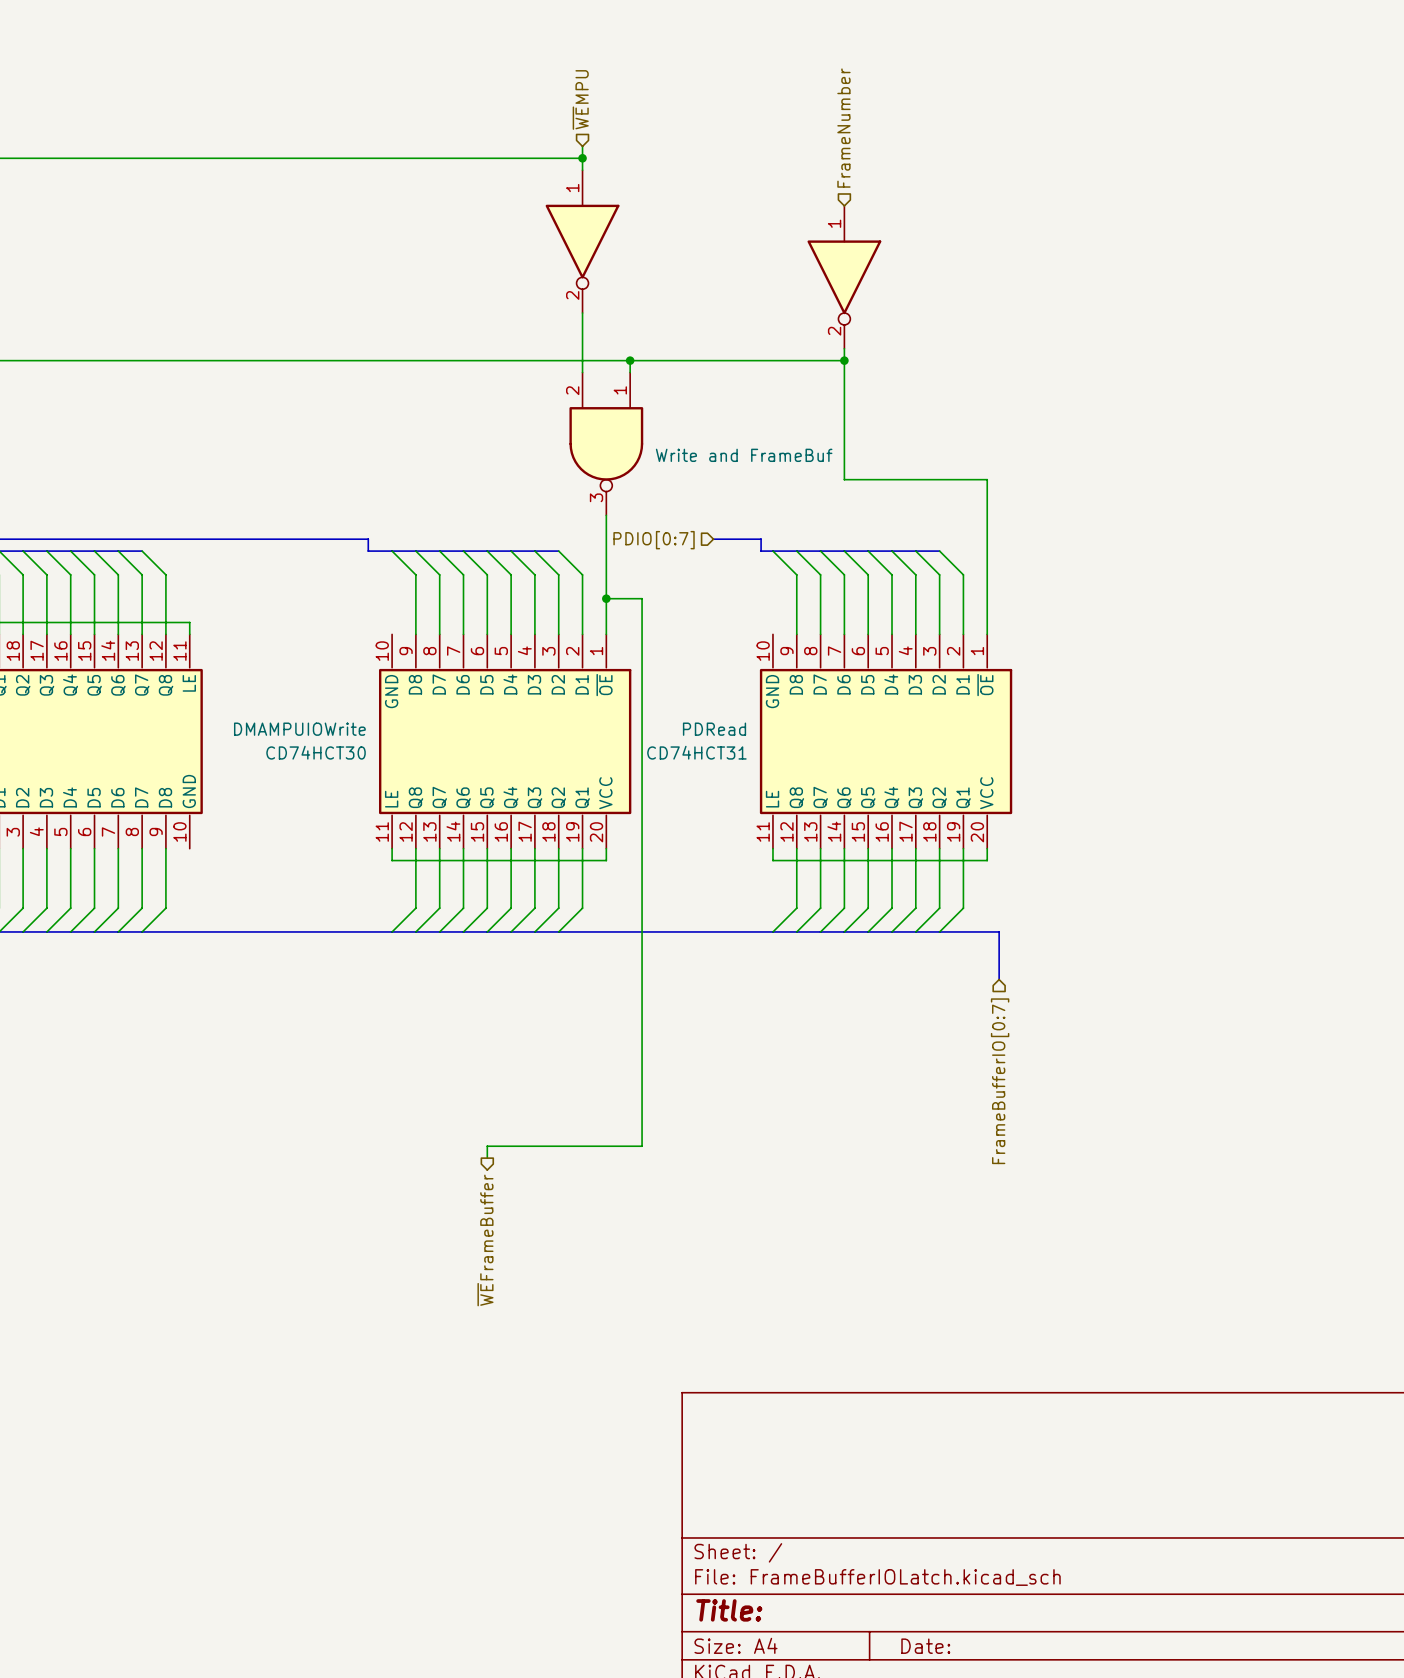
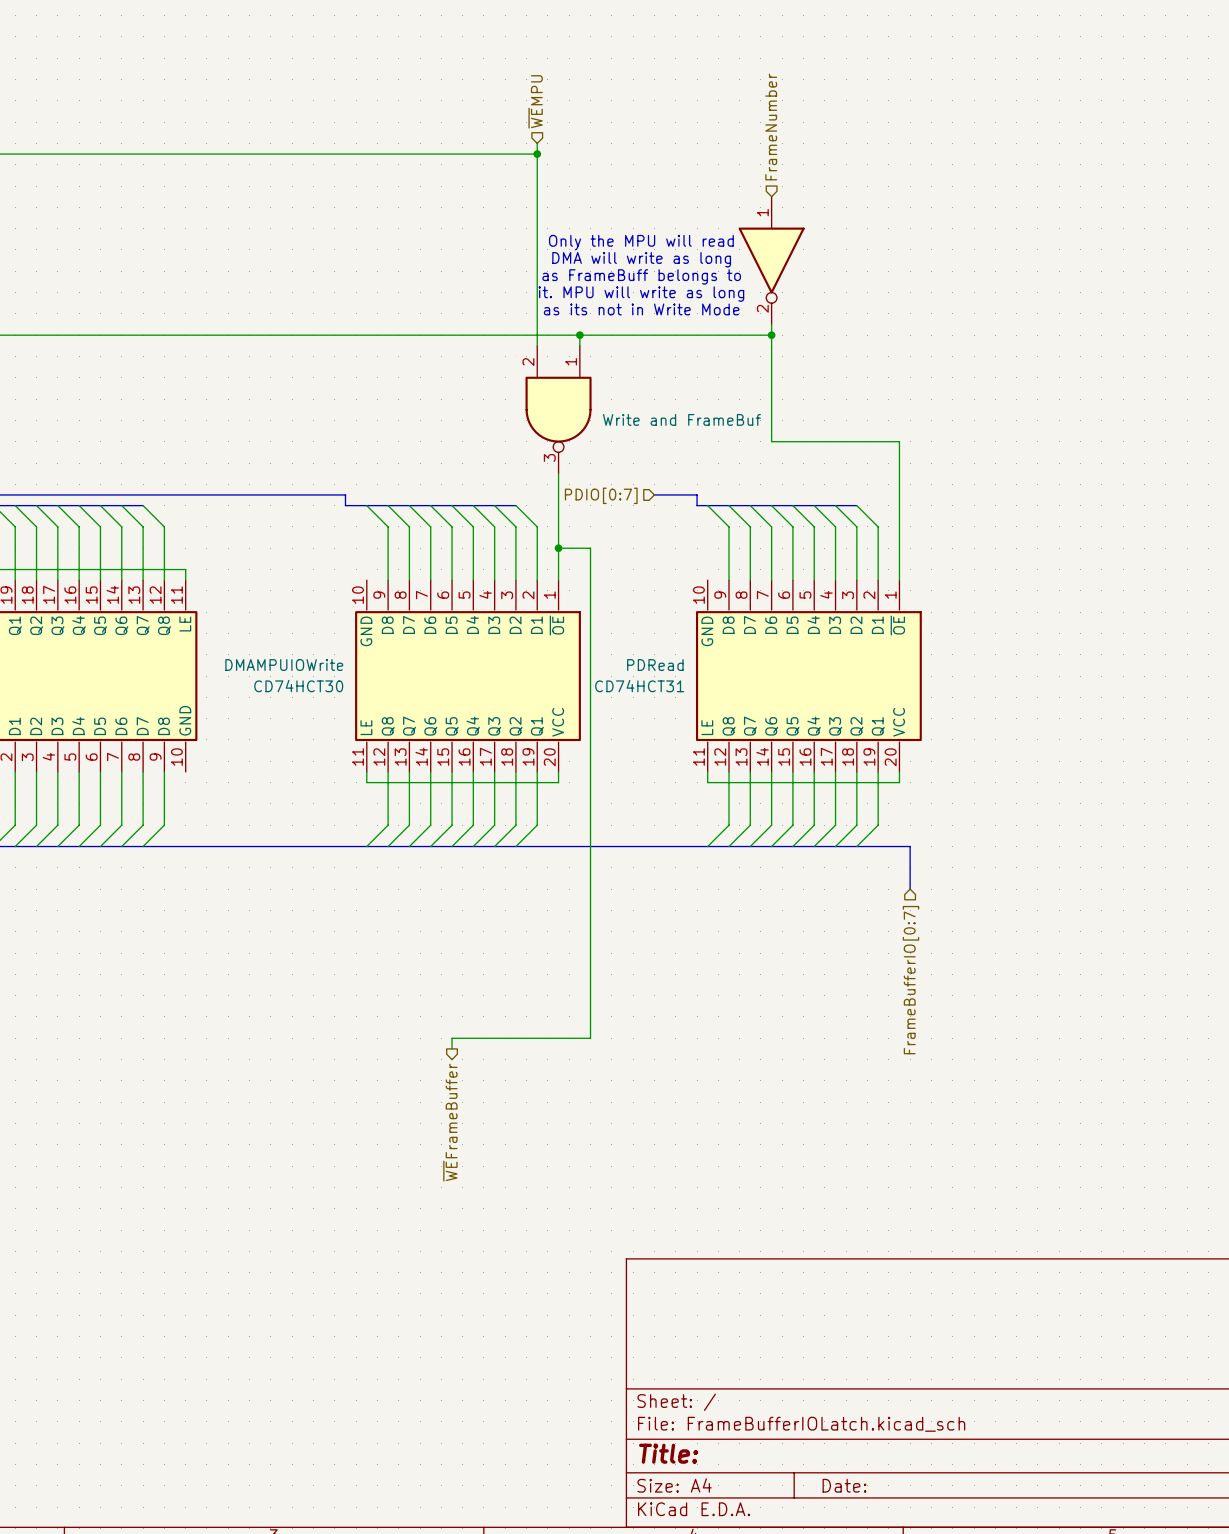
part: (582, 241) -> none
text: none -> Only the MPU will read (641, 242)
text: none -> DMA will write as long (641, 259)
text: none -> as FrameBuff belongs to (641, 276)
text: none -> it. MPU will write as long (641, 294)
text: none -> as its not in Write Mode (641, 309)

